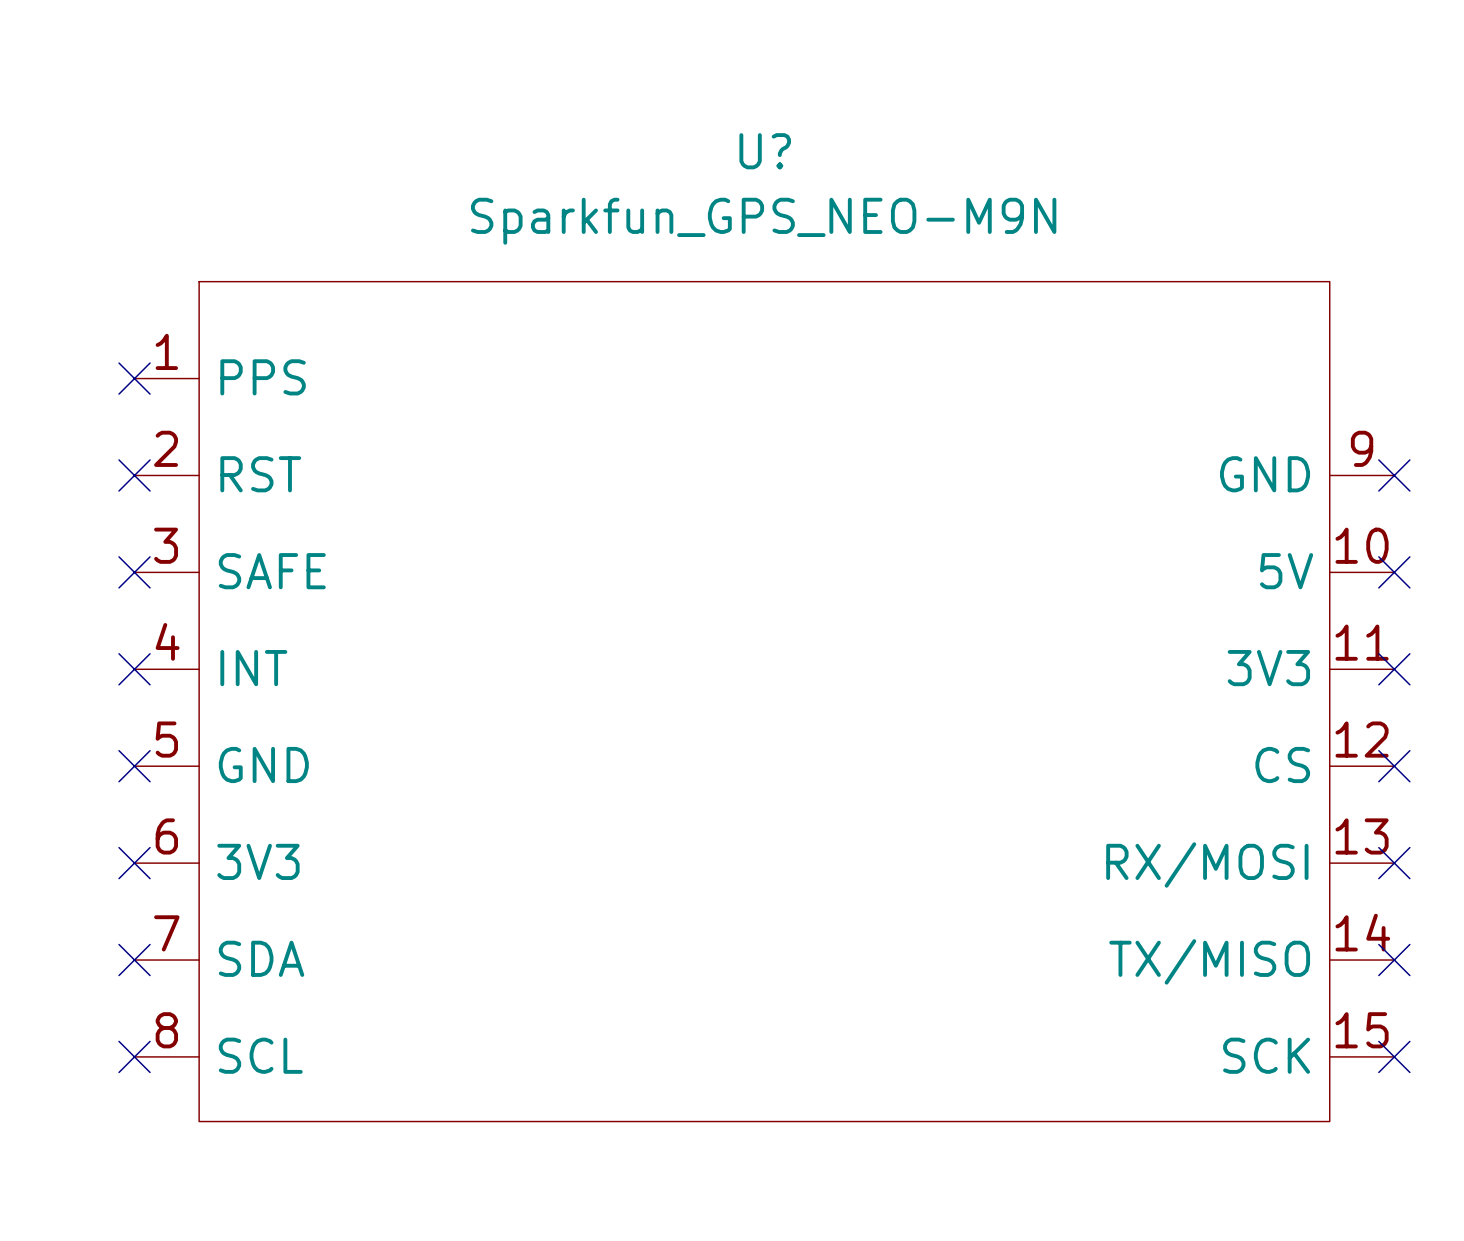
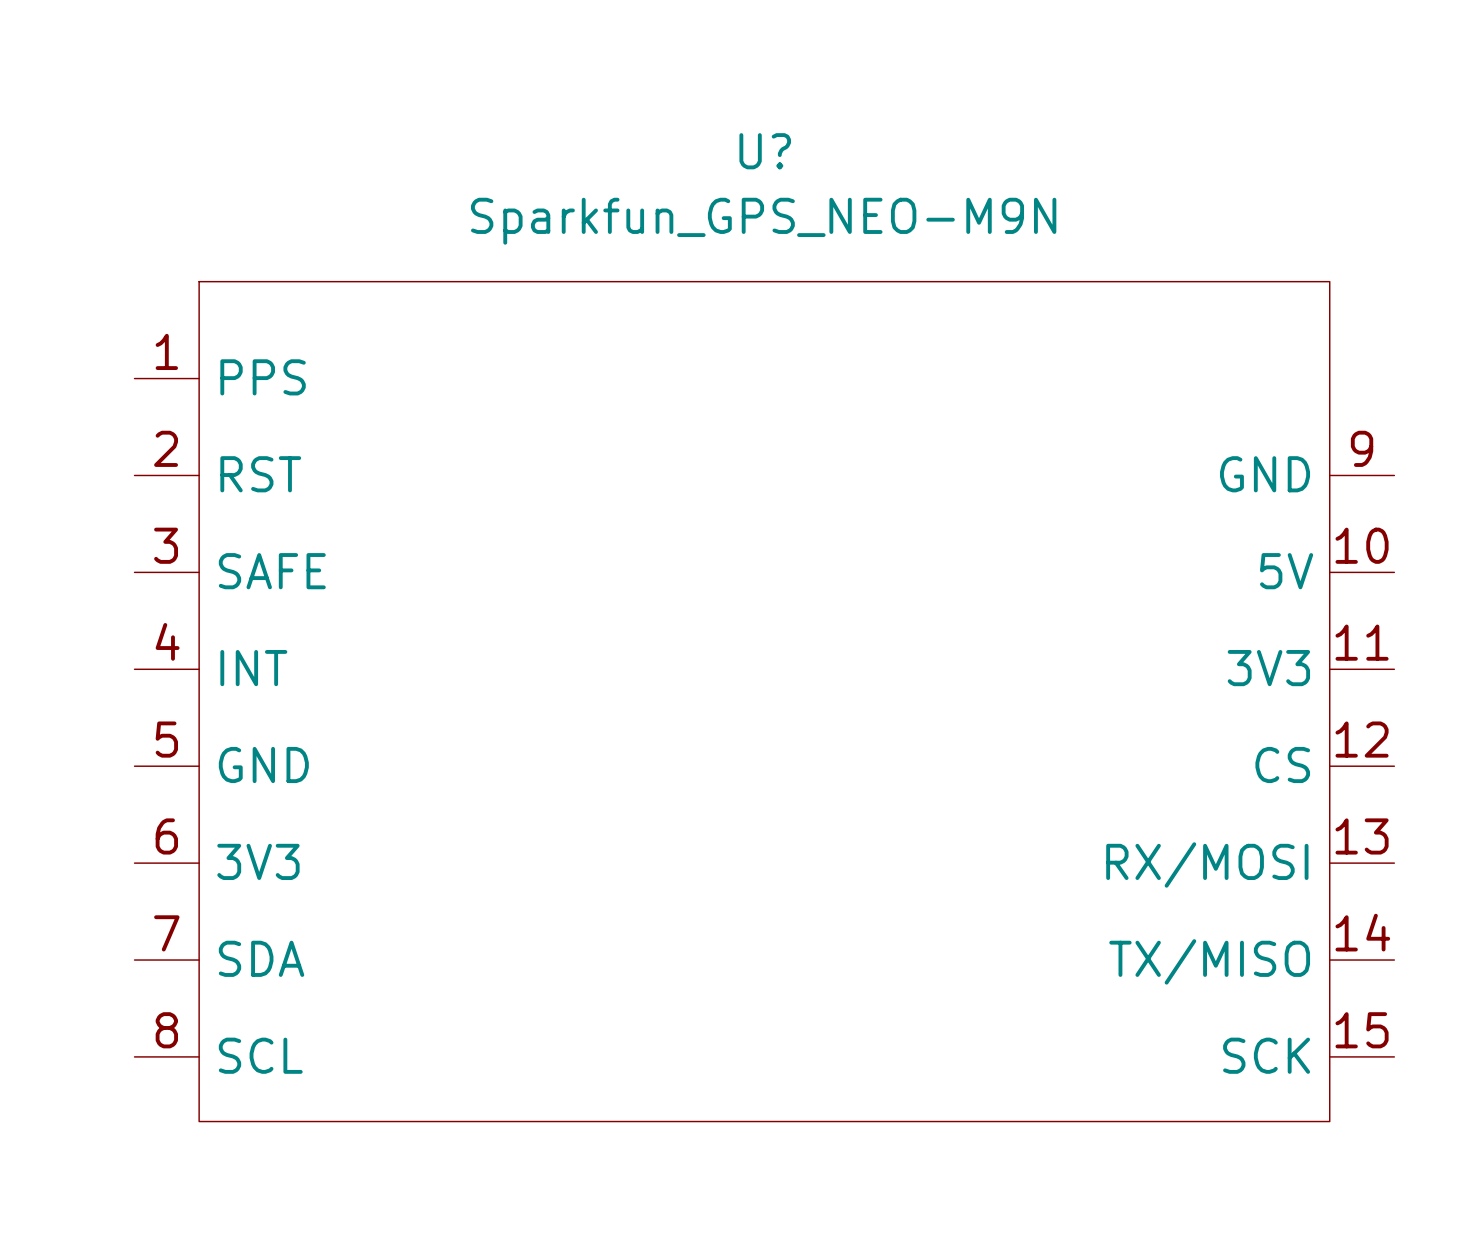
no-connect mark: (134, 378) -> none
no-connect mark: (134, 475) -> none
no-connect mark: (1394, 475) -> none
no-connect mark: (134, 572) -> none
no-connect mark: (1394, 572) -> none
no-connect mark: (134, 669) -> none
no-connect mark: (1394, 669) -> none
no-connect mark: (134, 766) -> none
no-connect mark: (1394, 766) -> none
no-connect mark: (134, 863) -> none
no-connect mark: (1394, 863) -> none
no-connect mark: (134, 960) -> none
no-connect mark: (1394, 960) -> none
no-connect mark: (134, 1056) -> none
no-connect mark: (1394, 1056) -> none

